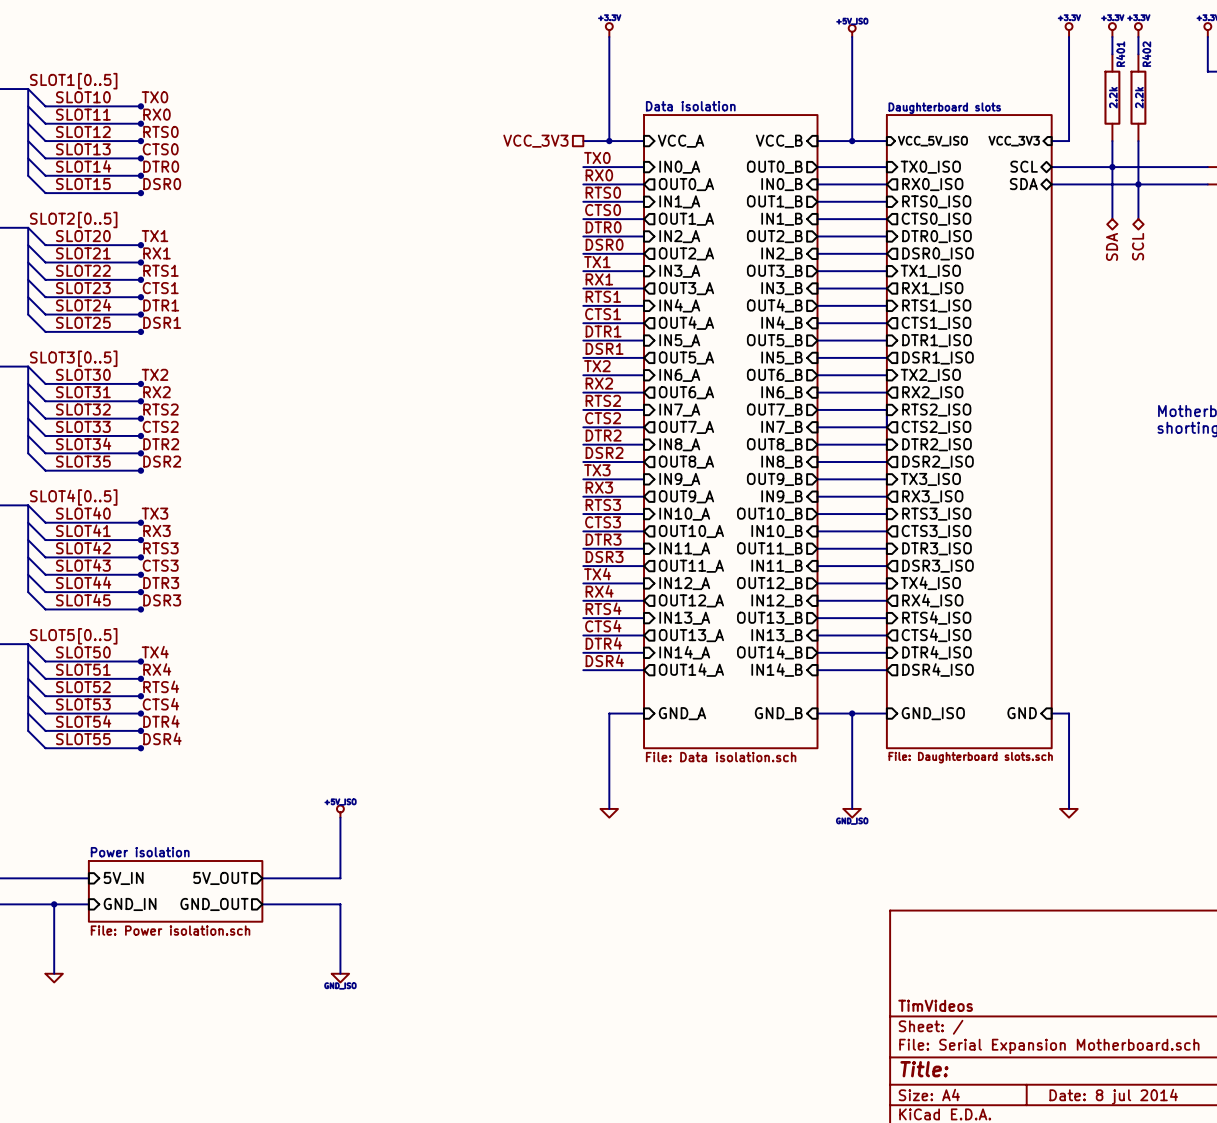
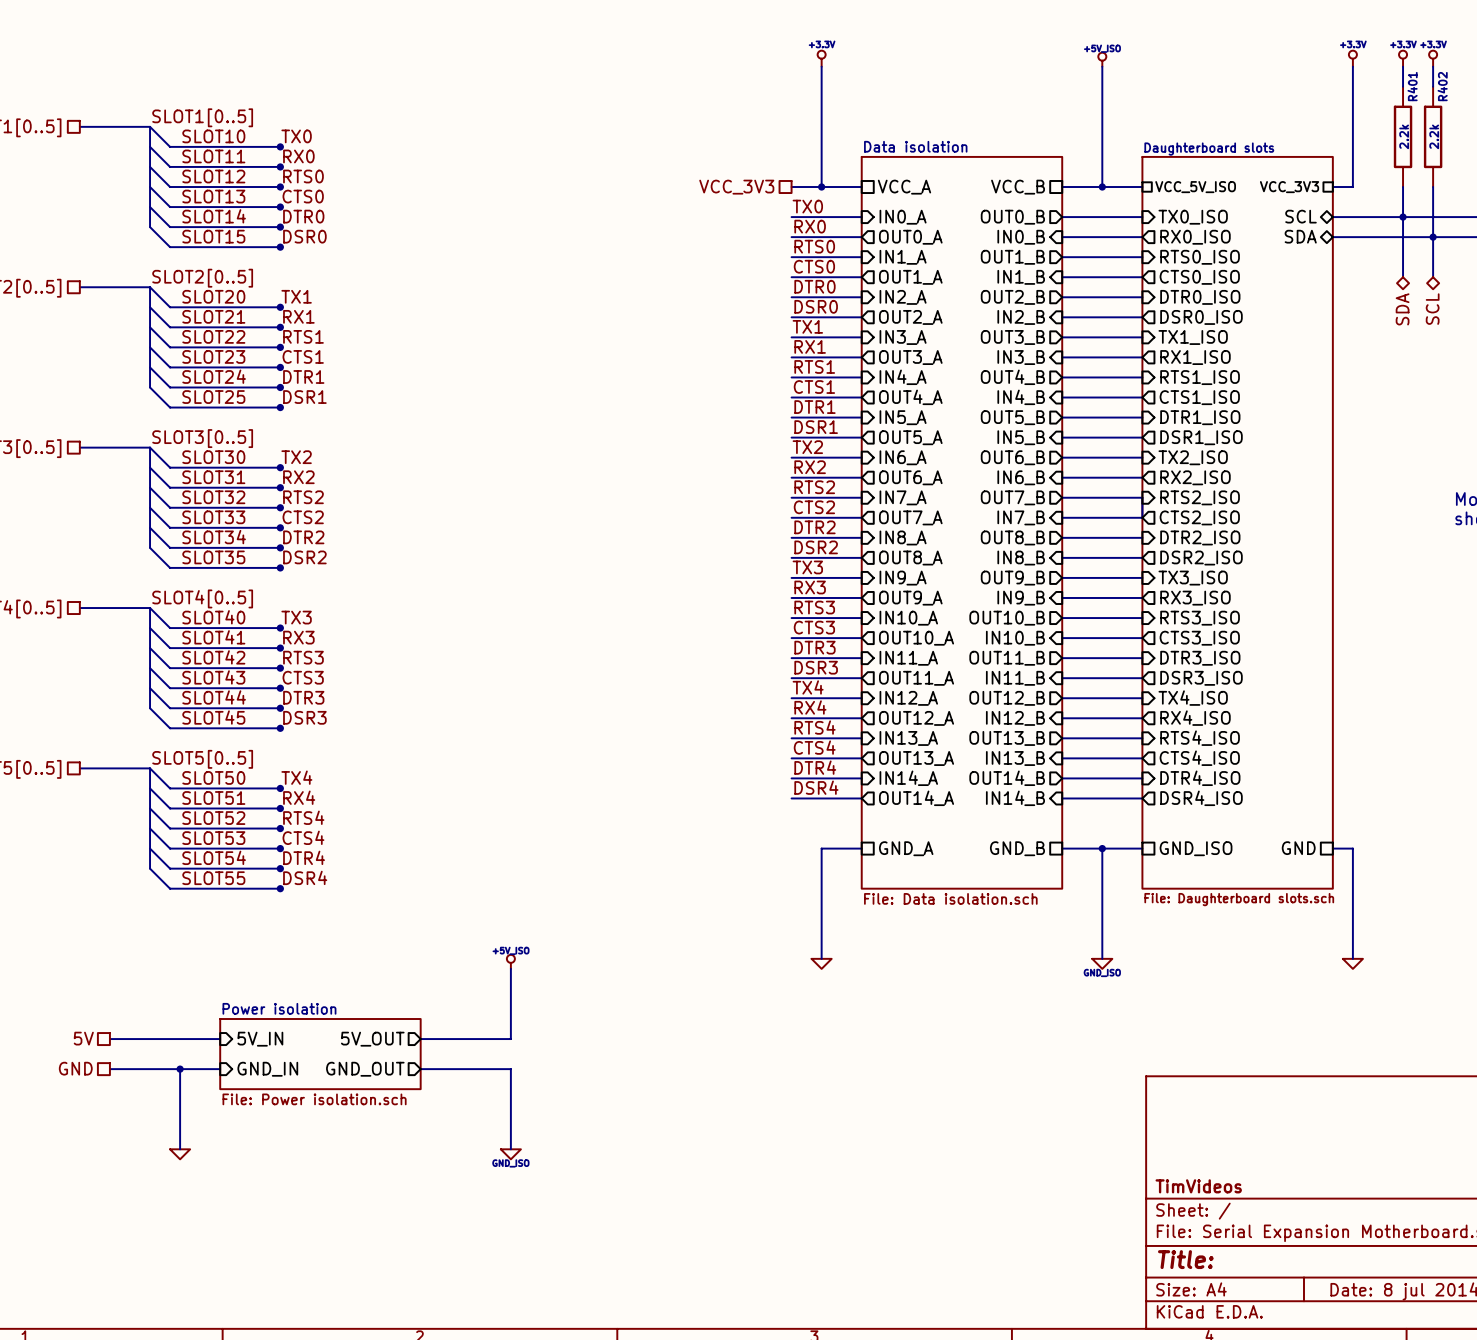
sheet pin shape: input (681, 141) -> passive (904, 187)
sheet pin shape: input (779, 141) -> passive (1018, 187)
sheet pin shape: input (932, 141) -> passive (1195, 187)
sheet pin shape: input (1014, 141) -> passive (1289, 187)
sheet pin shape: input (682, 713) -> passive (906, 848)
sheet pin shape: input (778, 713) -> passive (1017, 848)
sheet pin shape: input (933, 713) -> passive (1196, 848)
sheet pin shape: input (1022, 713) -> passive (1298, 848)

